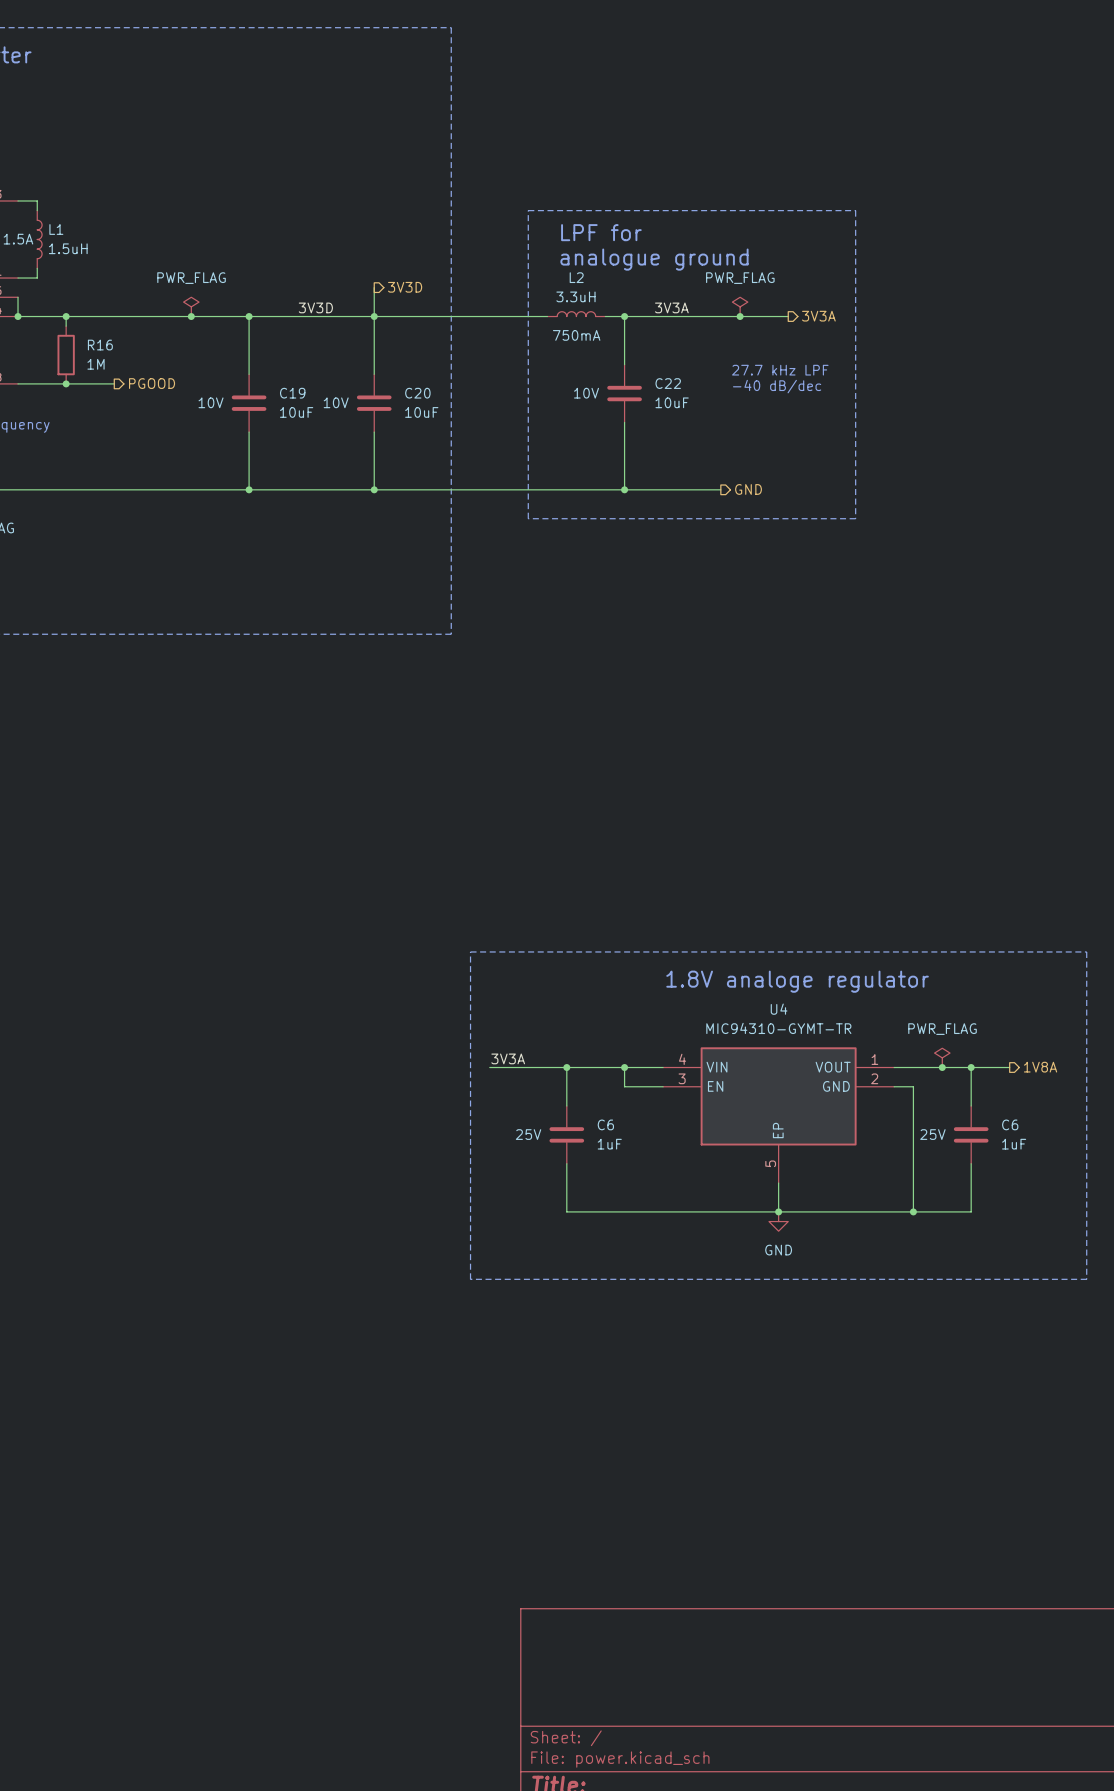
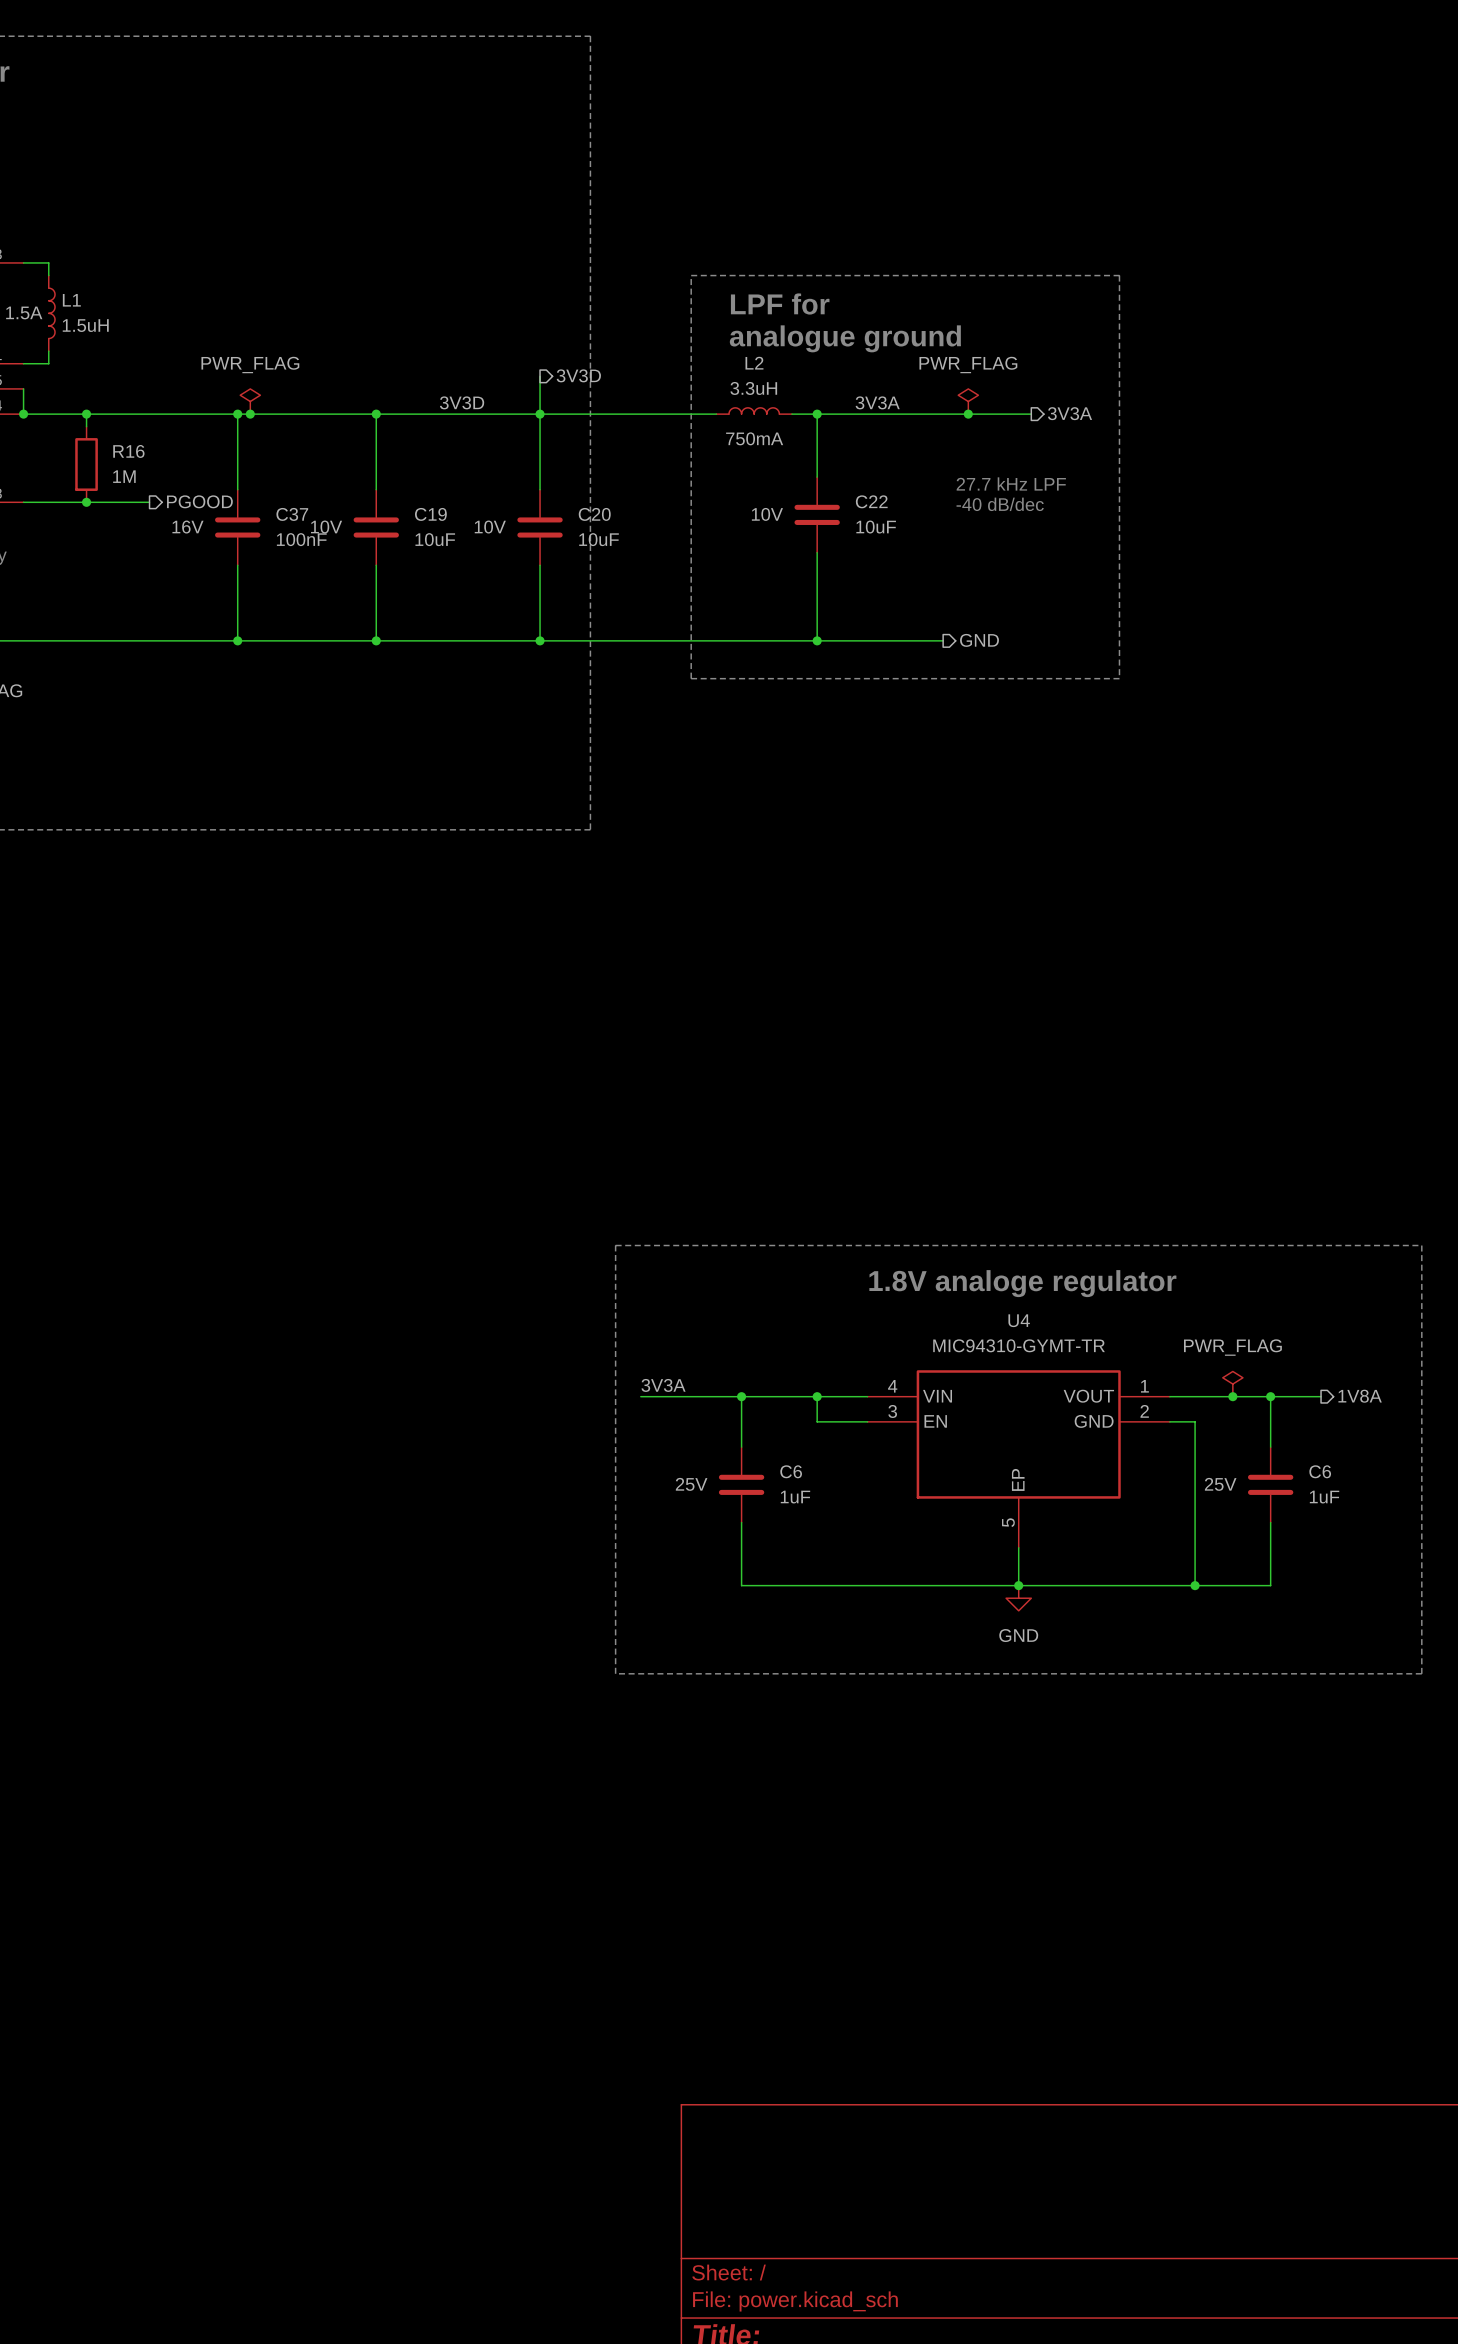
wire: (374, 287) (374, 374) -> (540, 376) (540, 489)
hierarchical label position: 3V3D (405, 287) -> 3V3D (578, 375)
label position: 3V3D (315, 307) -> 3V3D (462, 402)
wire: none -> (237, 414) (237, 489)
junction: none -> (237, 414)
wire: (249, 316) (249, 374) -> (376, 414) (376, 489)
junction: (249, 316) -> none
junction: none -> (376, 414)
junction position: (374, 316) -> (540, 414)
C37: none -> 100nF (237, 527)
C19 position: (249, 403) -> (376, 527)
C20 position: (374, 403) -> (540, 527)
wire: none -> (237, 565) (237, 640)
wire: (249, 432) (249, 489) -> (376, 565) (376, 640)
wire: (374, 432) (374, 489) -> (540, 565) (540, 640)
junction: none -> (237, 640)
junction: (249, 489) -> none
junction: none -> (376, 640)
junction position: (374, 489) -> (540, 640)

